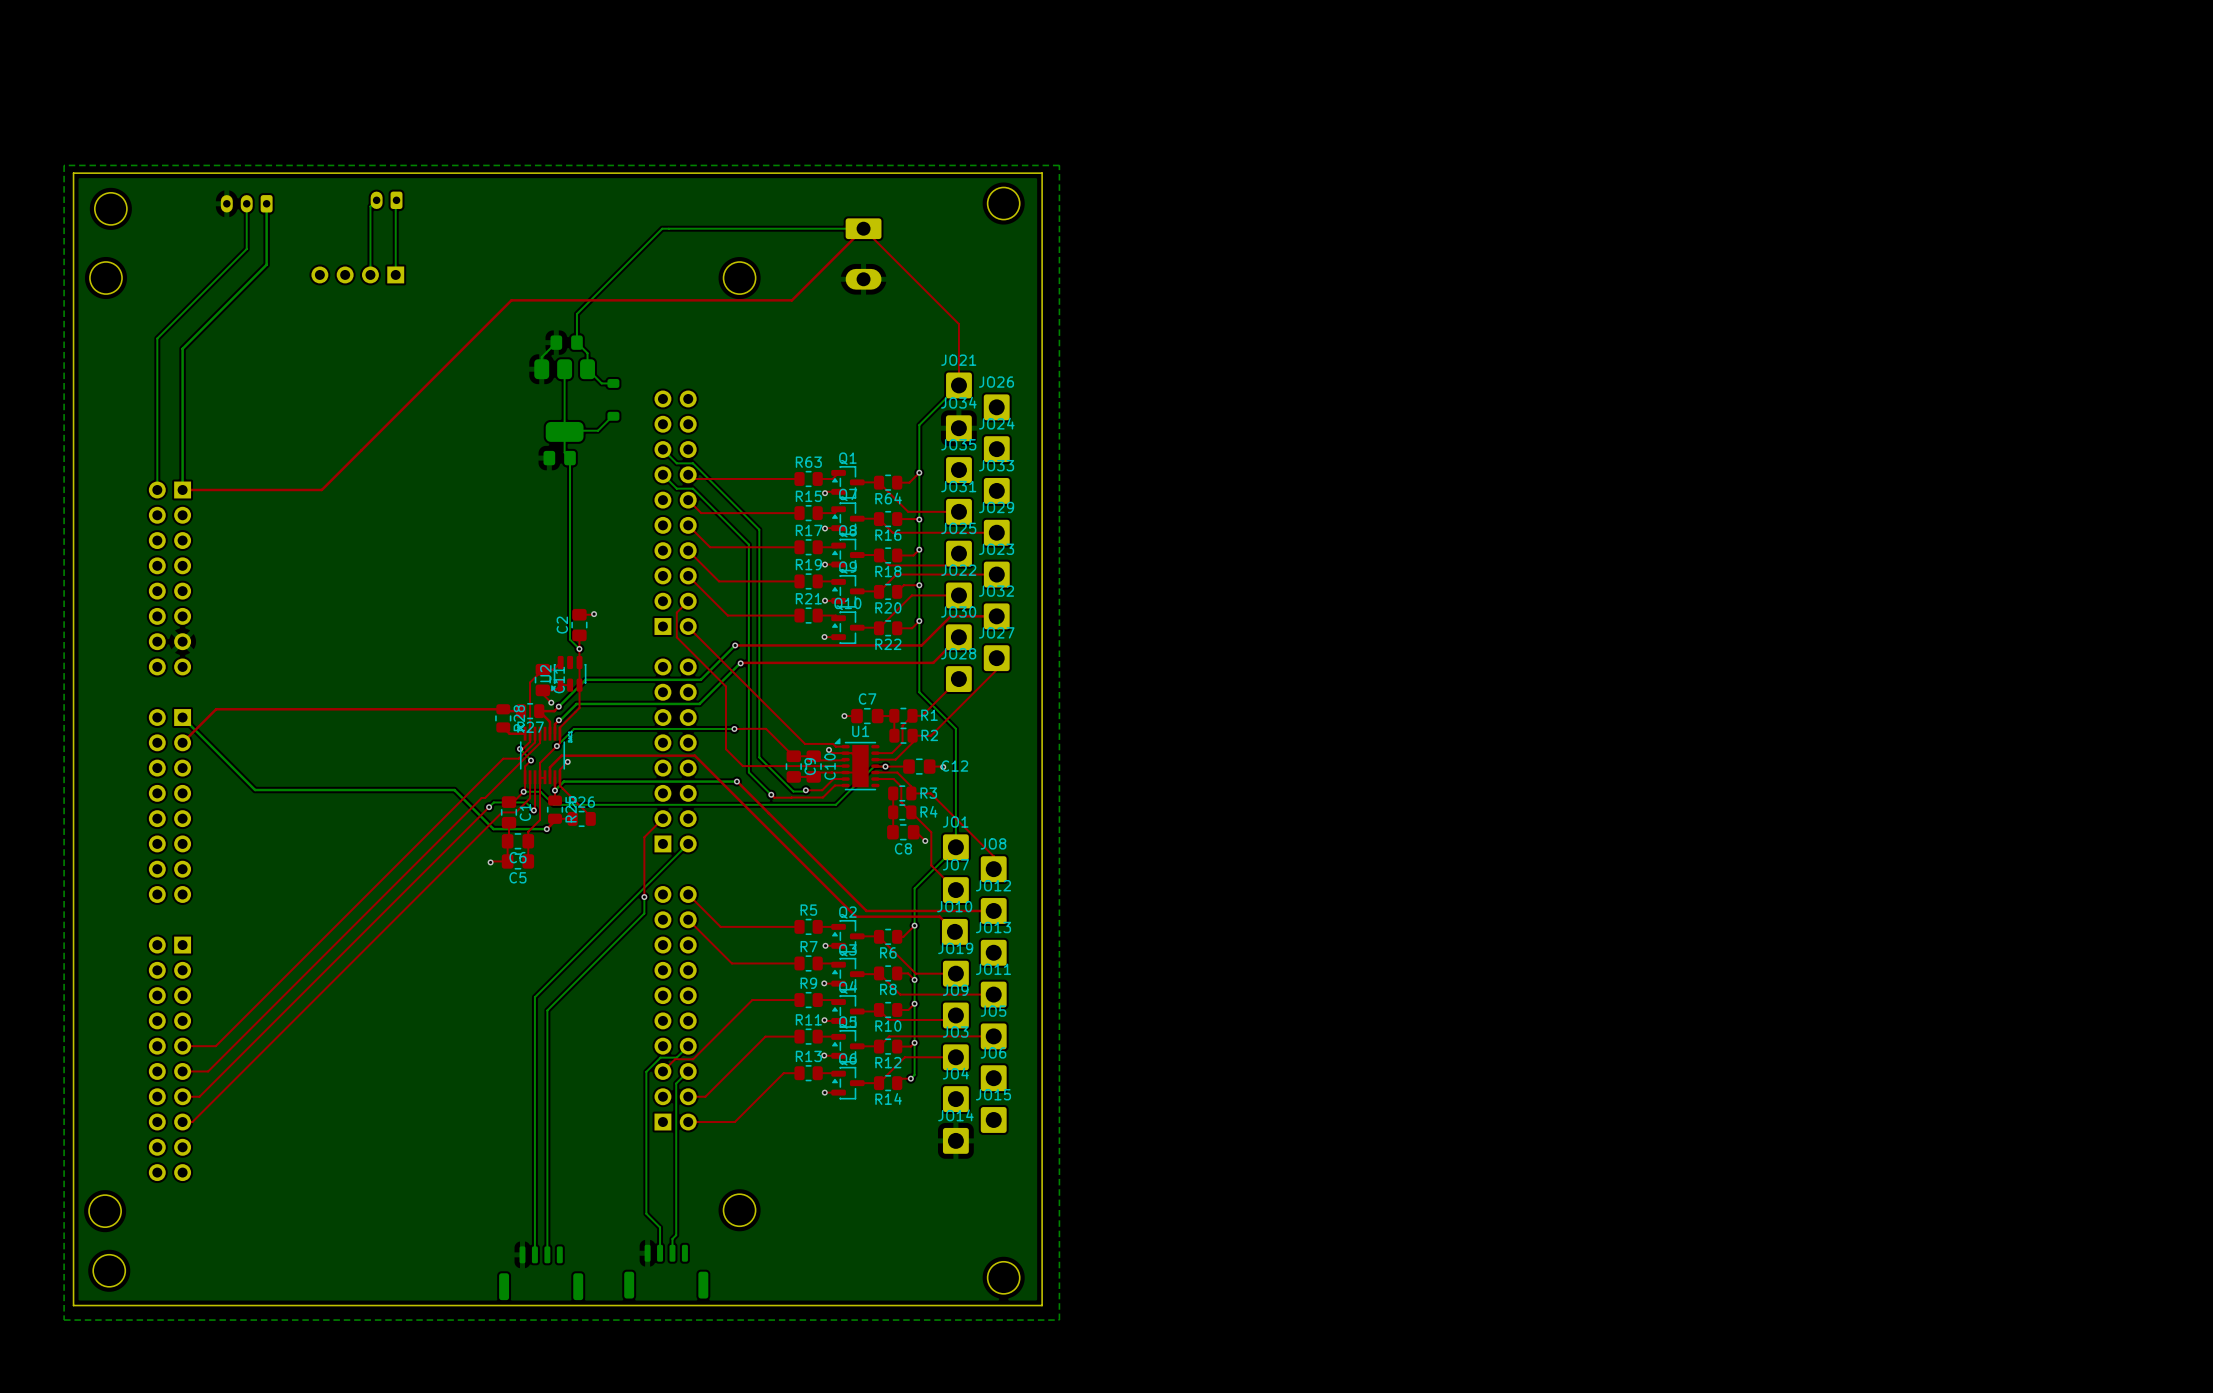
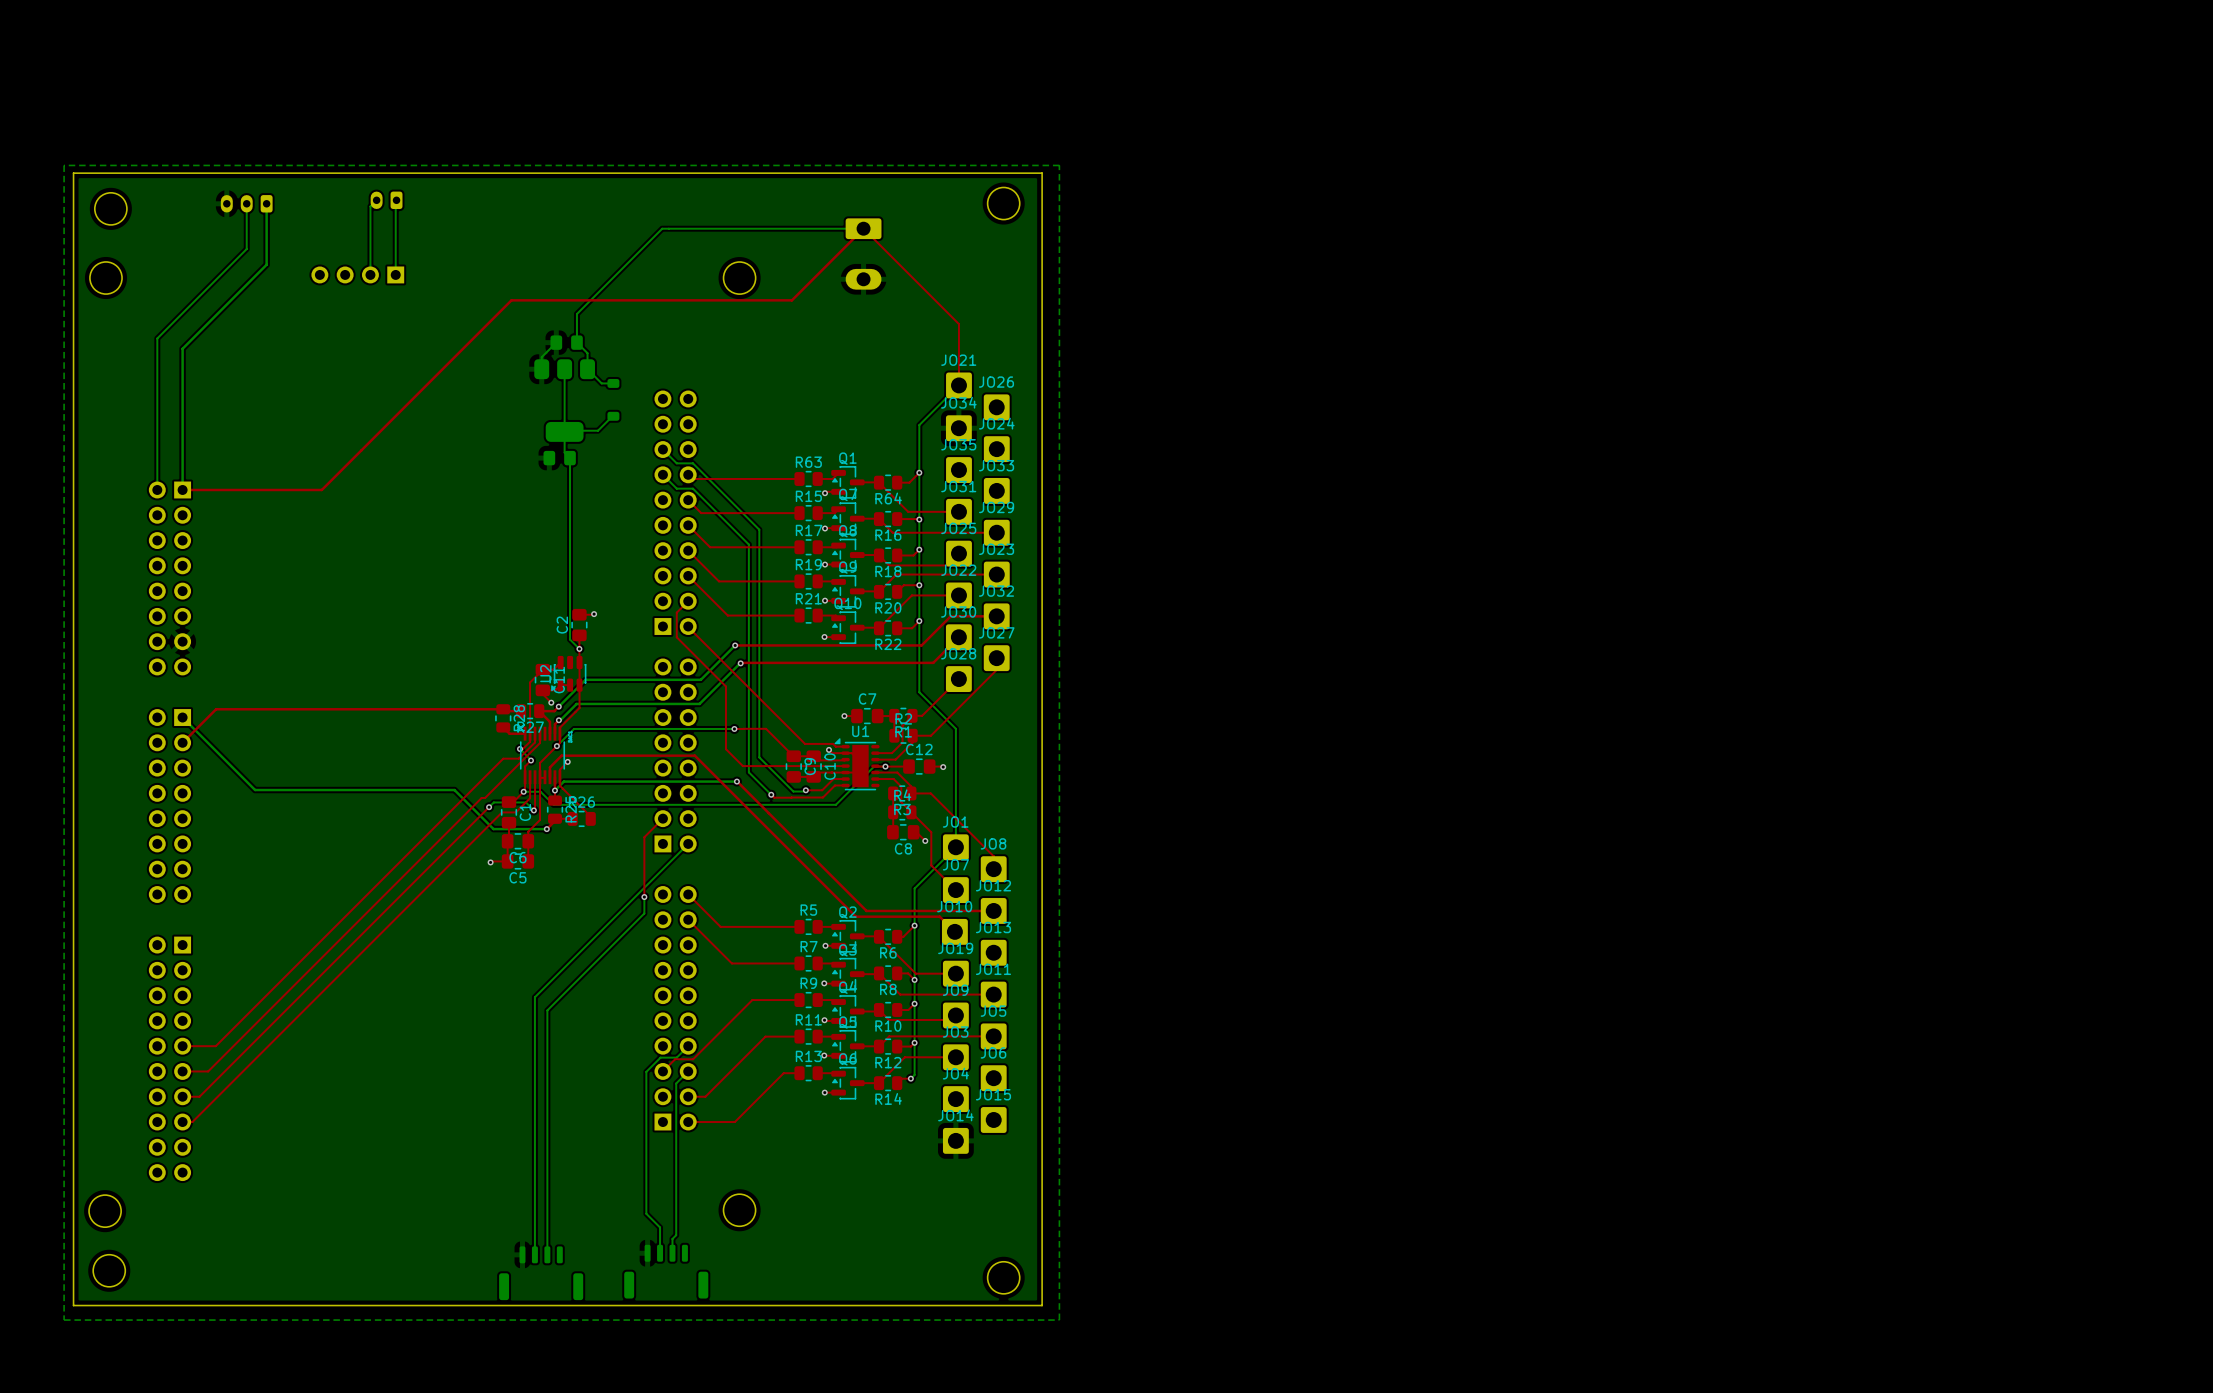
R1 name position: R1 (929, 715) -> R1 (903, 731)
R2 name position: R2 (929, 735) -> R2 (903, 718)
C12 name position: C12 (954, 766) -> C12 (919, 749)
R3 name position: R3 (928, 793) -> R3 (902, 809)
R4 name position: R4 (929, 811) -> R4 (902, 795)

